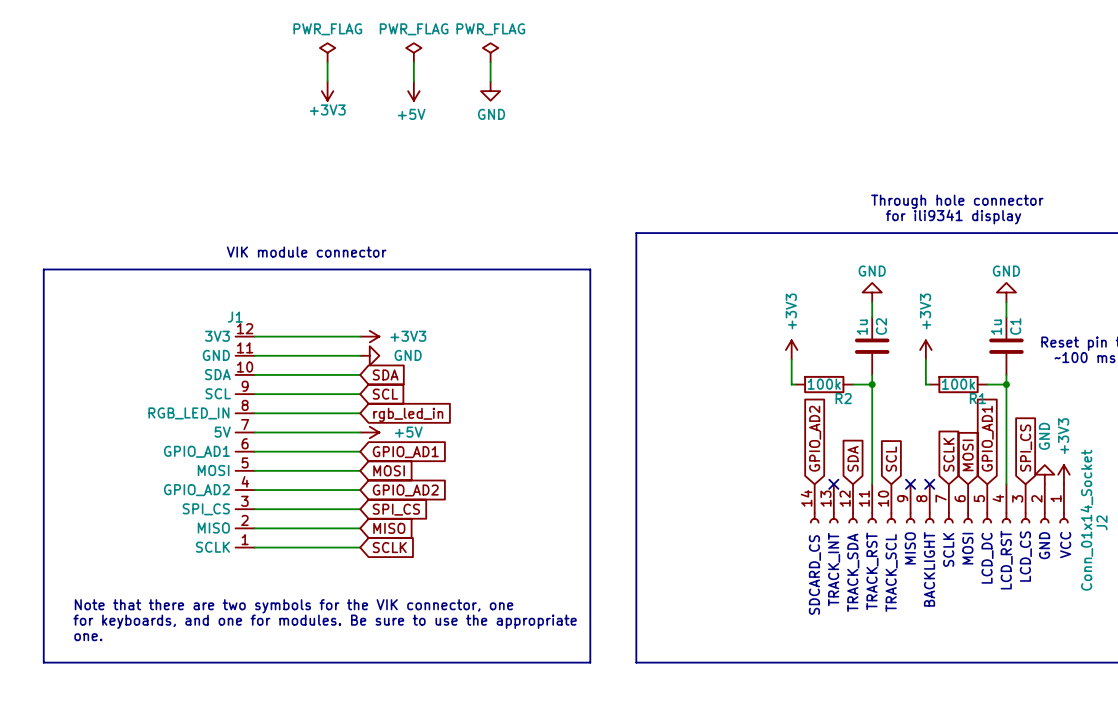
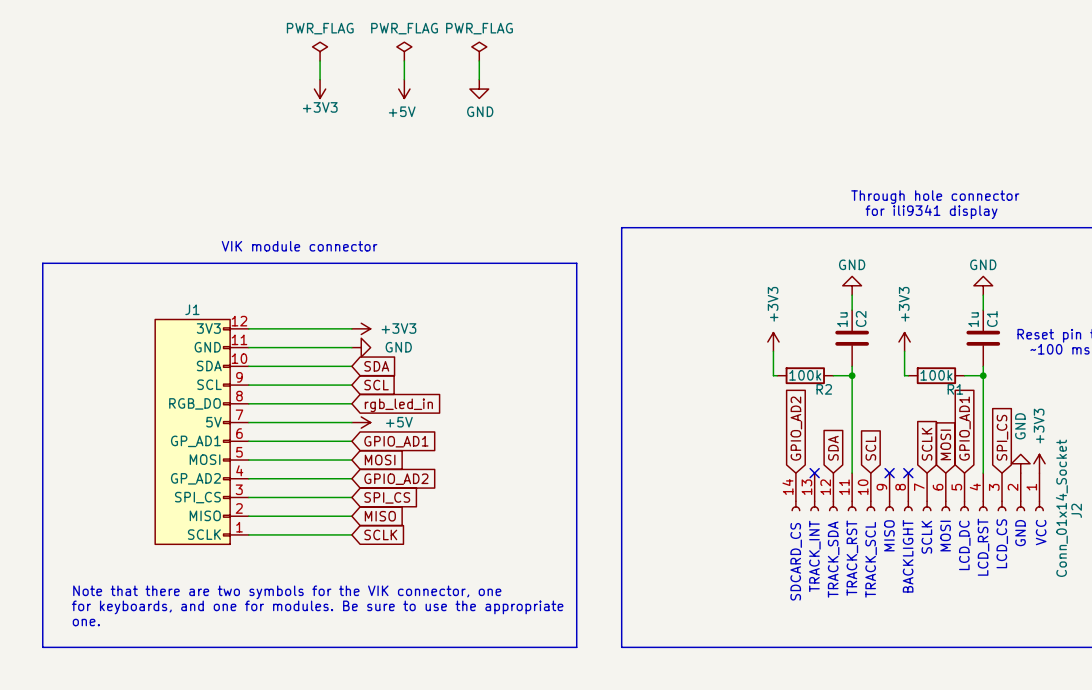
J1 symbol: [235, 336, 255, 548] -> [155, 319, 249, 545]

